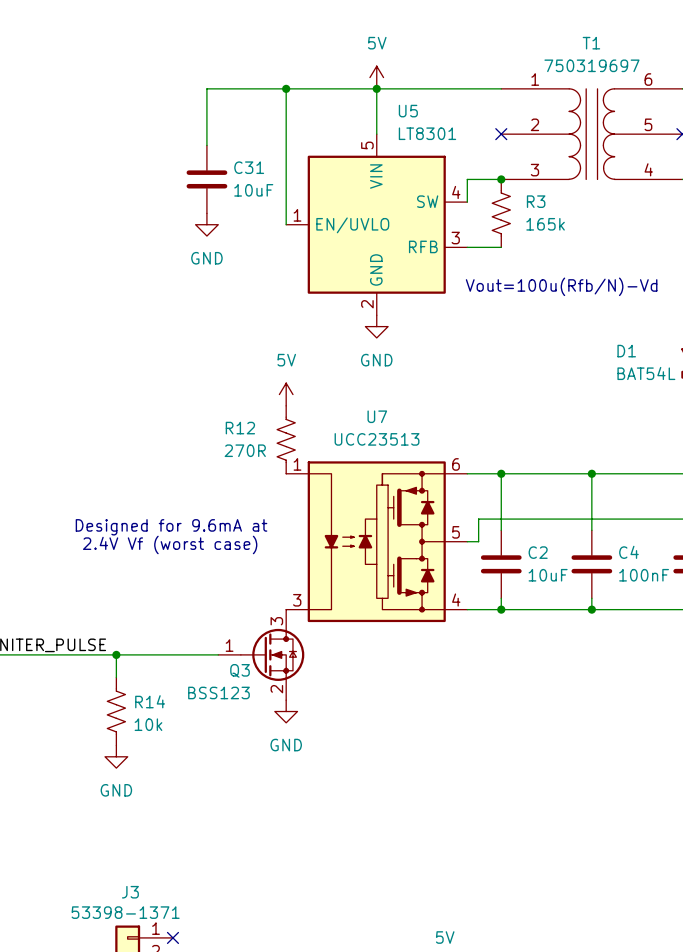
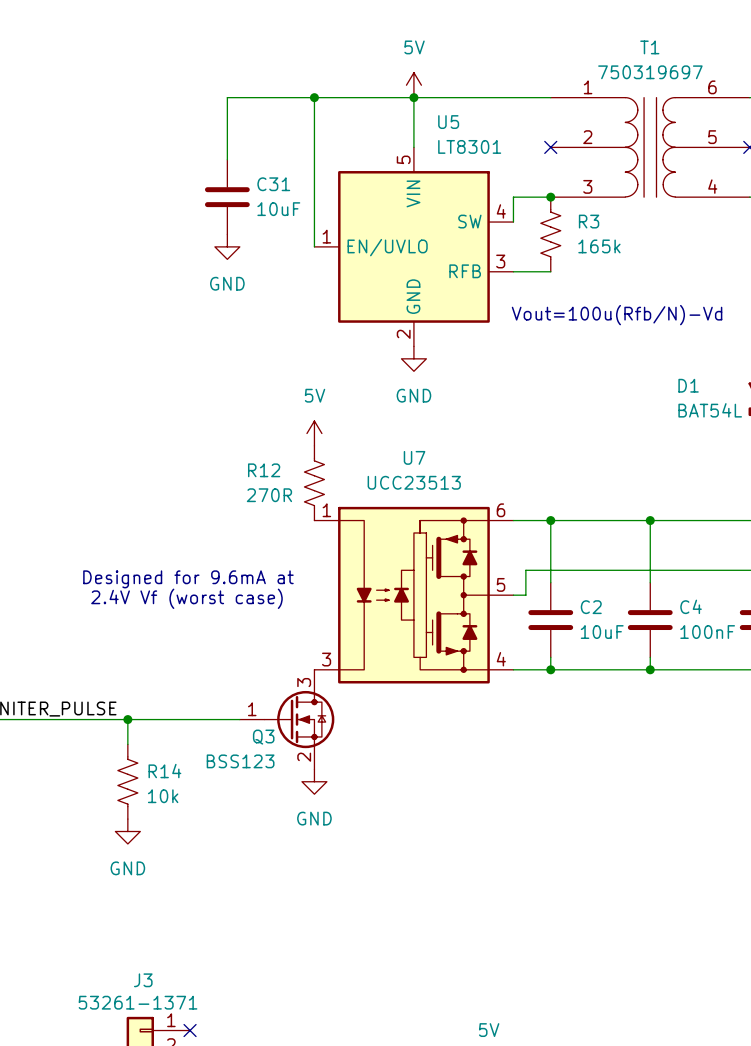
J3 value: 53398-1371 (125, 912) -> 53261-1371 (138, 1002)

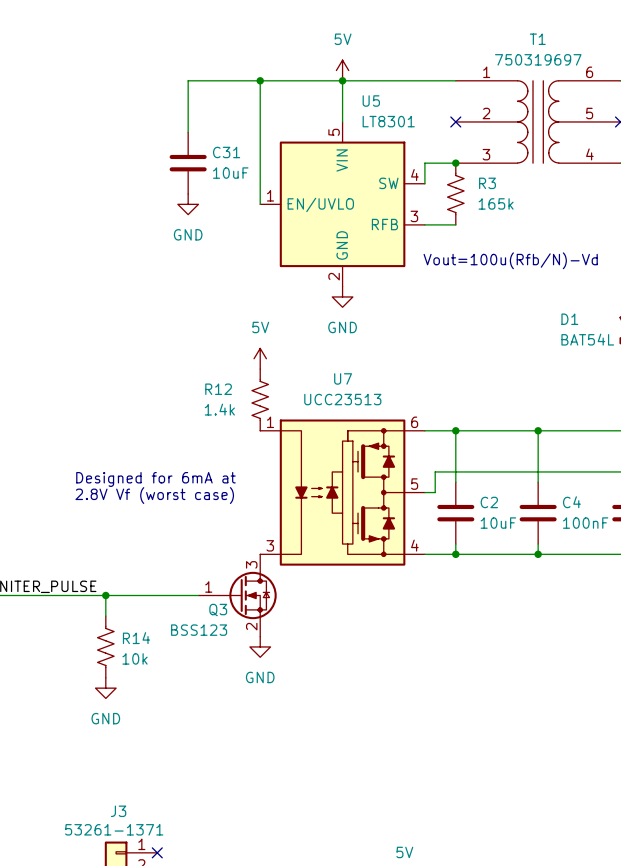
R12 value: 270R (269, 495) -> 1.4k (219, 409)
text: Designed for 9.6mA at (188, 579) -> Designed for 6mA at (155, 479)
text: 2.4V Vf (worst case) (186, 598) -> 2.8V Vf (worst case) (154, 495)

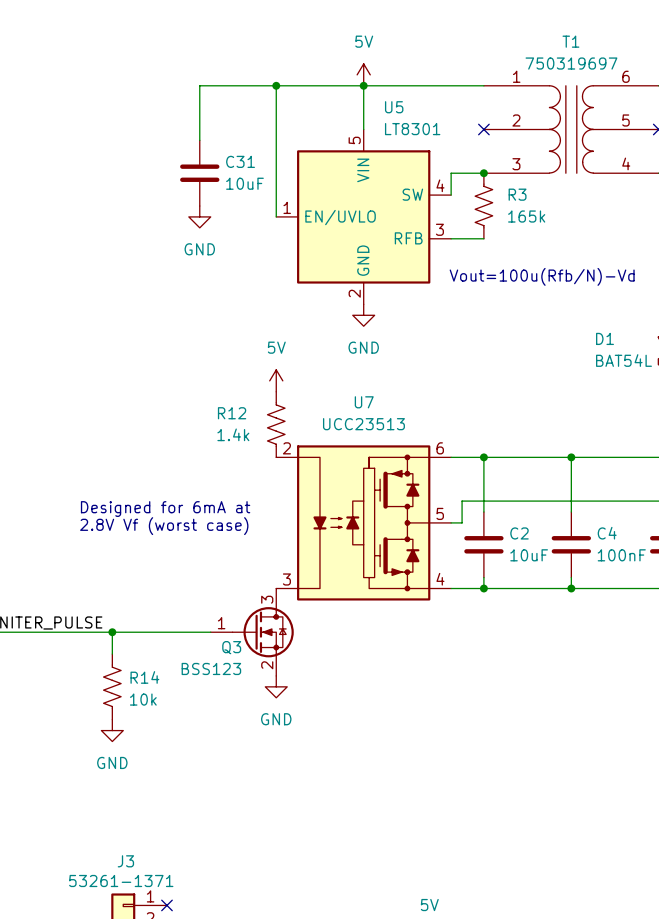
U7 pin number: 1 (270, 422) -> 2 (286, 448)

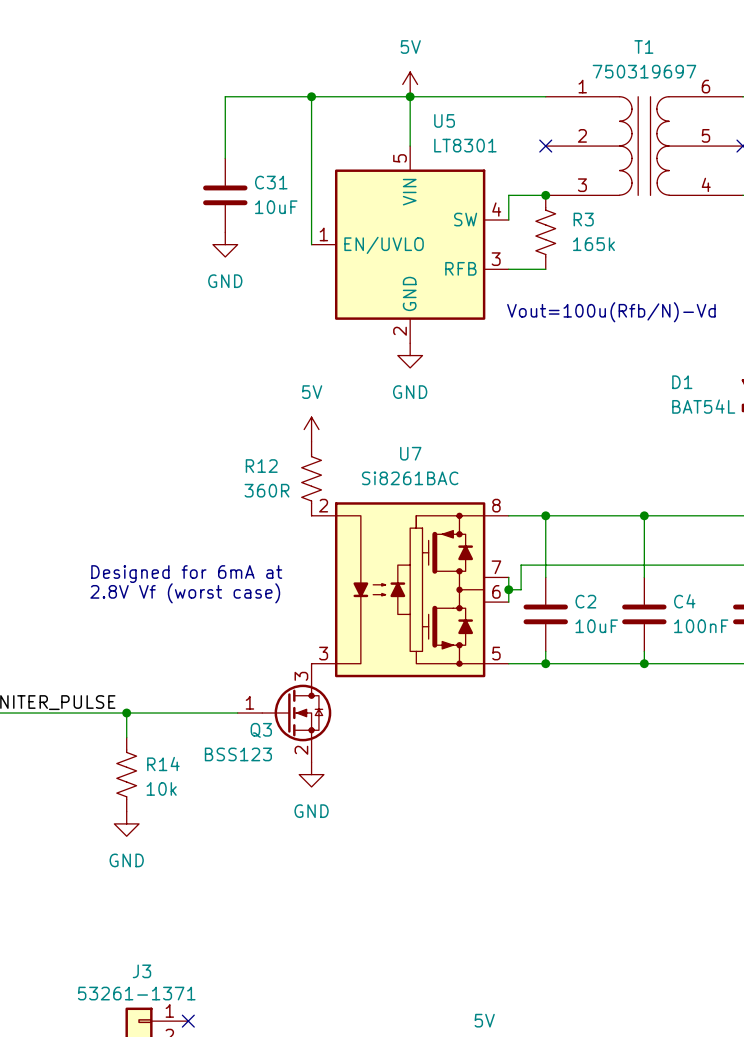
U7 value: UCC23513 (363, 424) -> Si8261BAC (410, 478)
R12 value: 1.4k (233, 434) -> 360R (267, 490)
U7 symbol: [276, 445, 452, 601] -> [311, 502, 509, 678]
wire: none -> (508, 577) (508, 602)
junction: none -> (508, 589)

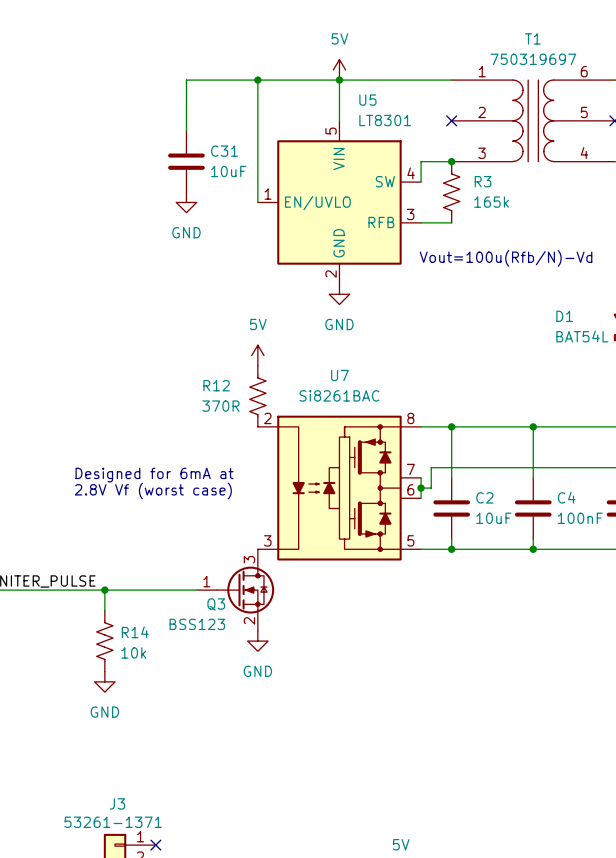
R12 value: 360R (267, 490) -> 370R (220, 406)

